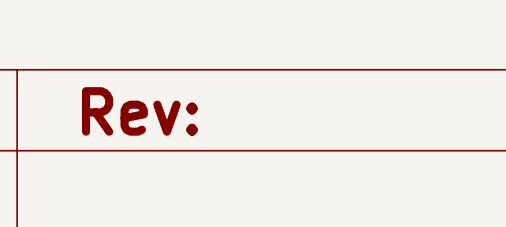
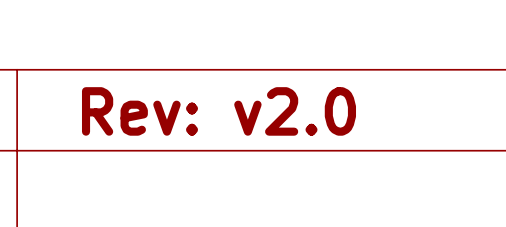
title block: Rev: (139, 111) -> Rev: v2.0 (218, 111)

